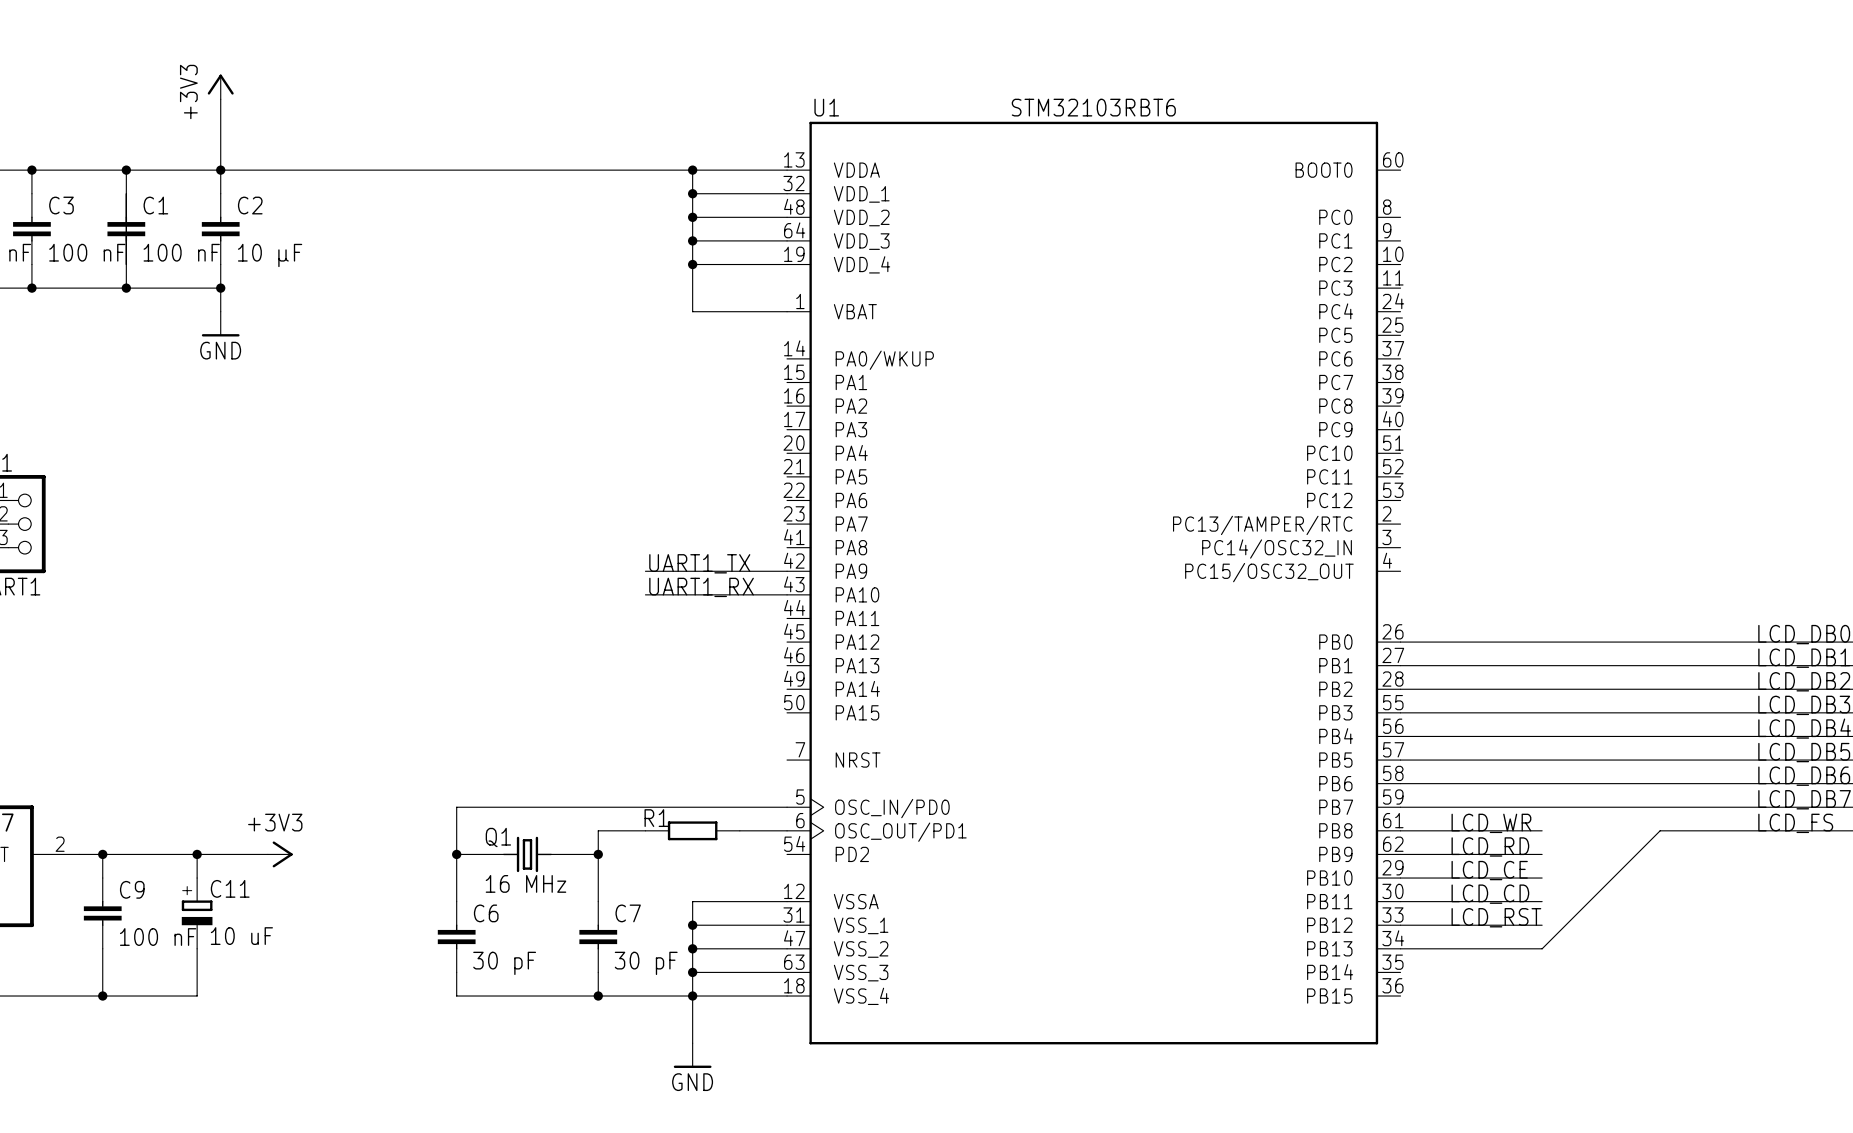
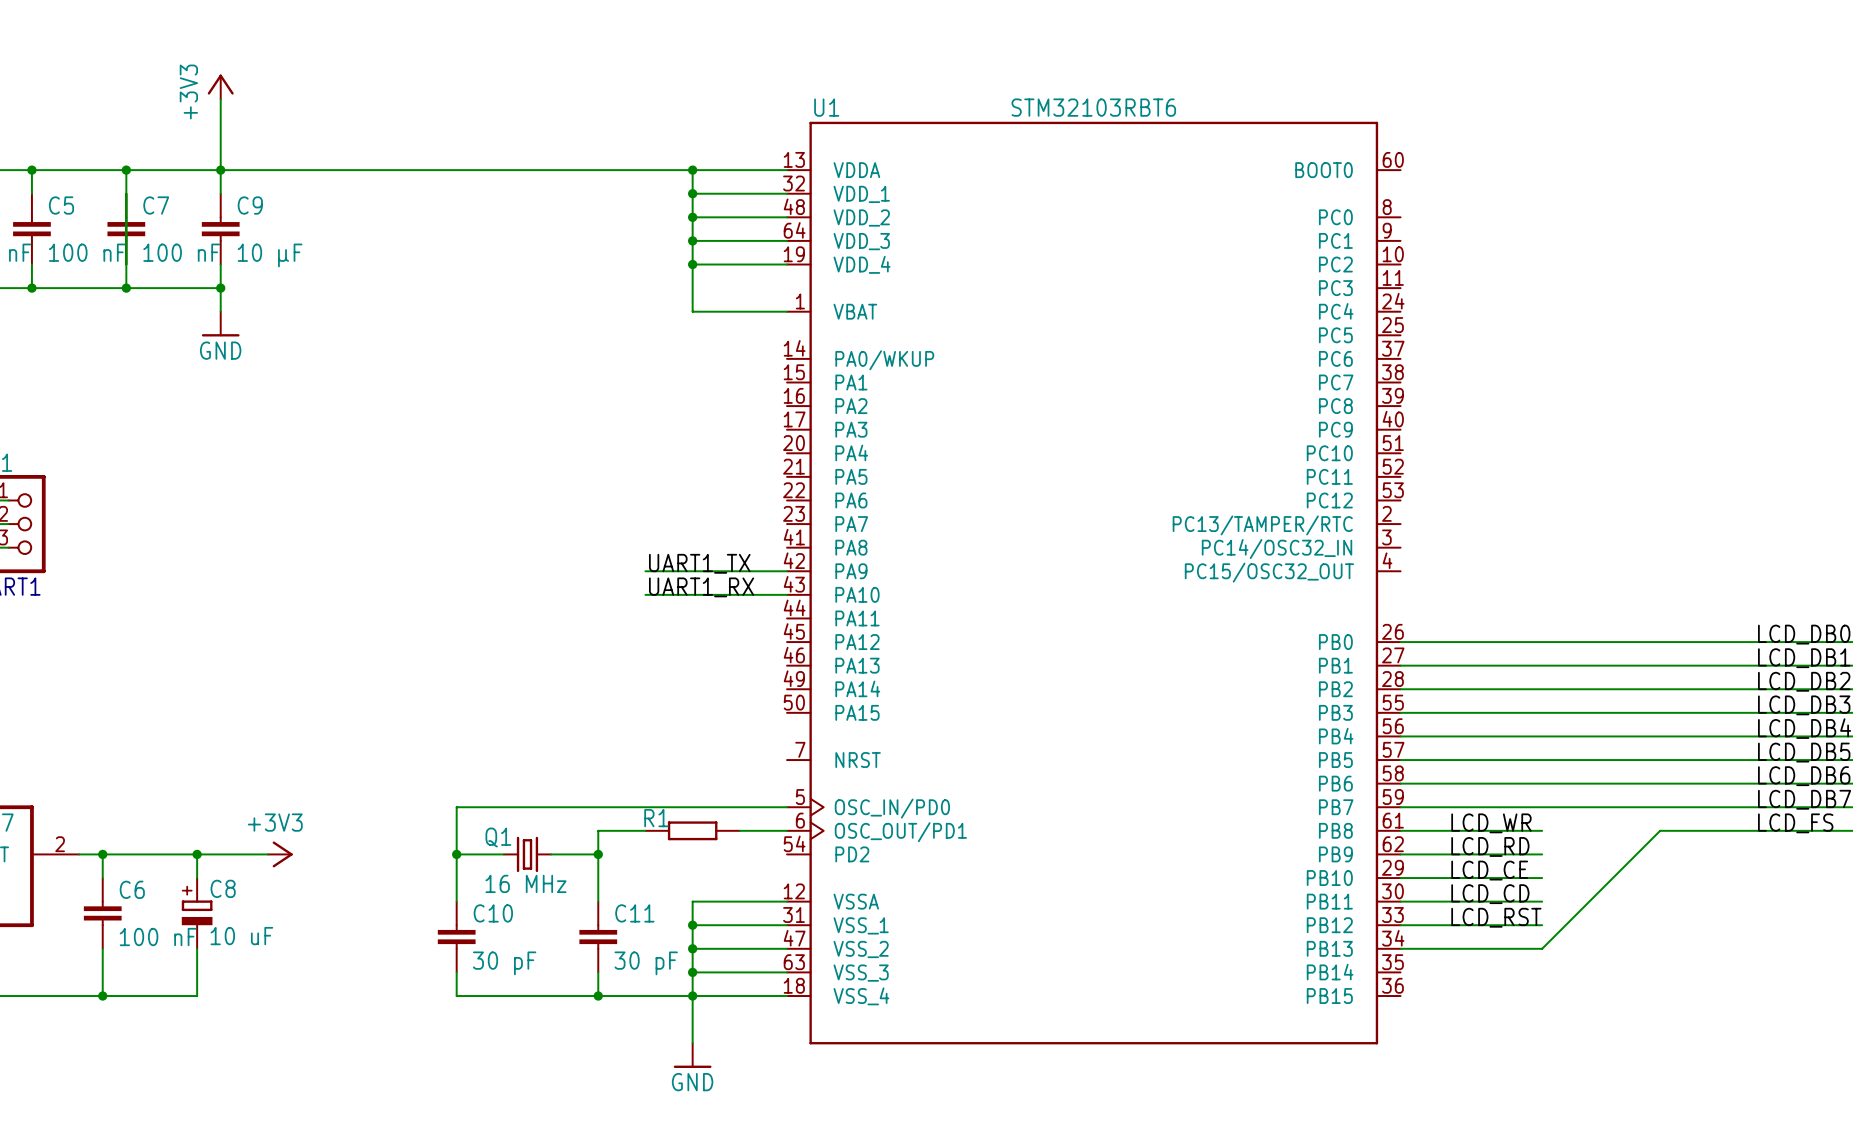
C3 name: C3 (61, 205) -> C5 (61, 205)
C1 name: C1 (155, 205) -> C7 (156, 205)
C2 name: C2 (250, 205) -> C9 (250, 205)
C11 name: C11 (230, 888) -> C8 (223, 888)
C9 name: C9 (132, 889) -> C6 (132, 889)
C6 name: C6 (486, 913) -> C10 (493, 913)
C7 name: C7 (628, 913) -> C11 (634, 913)

